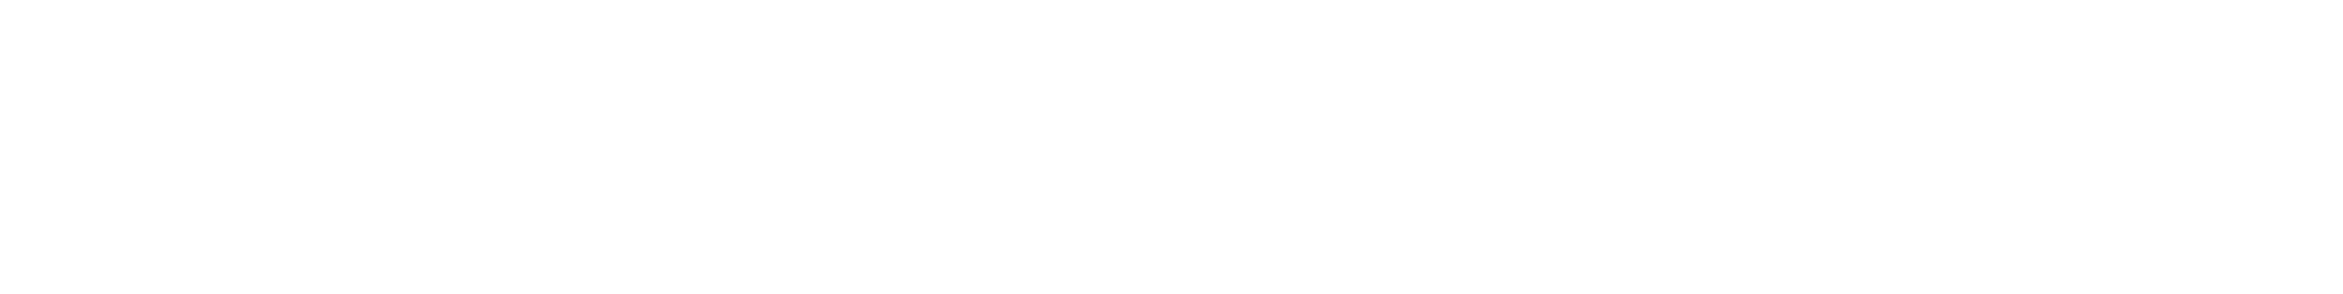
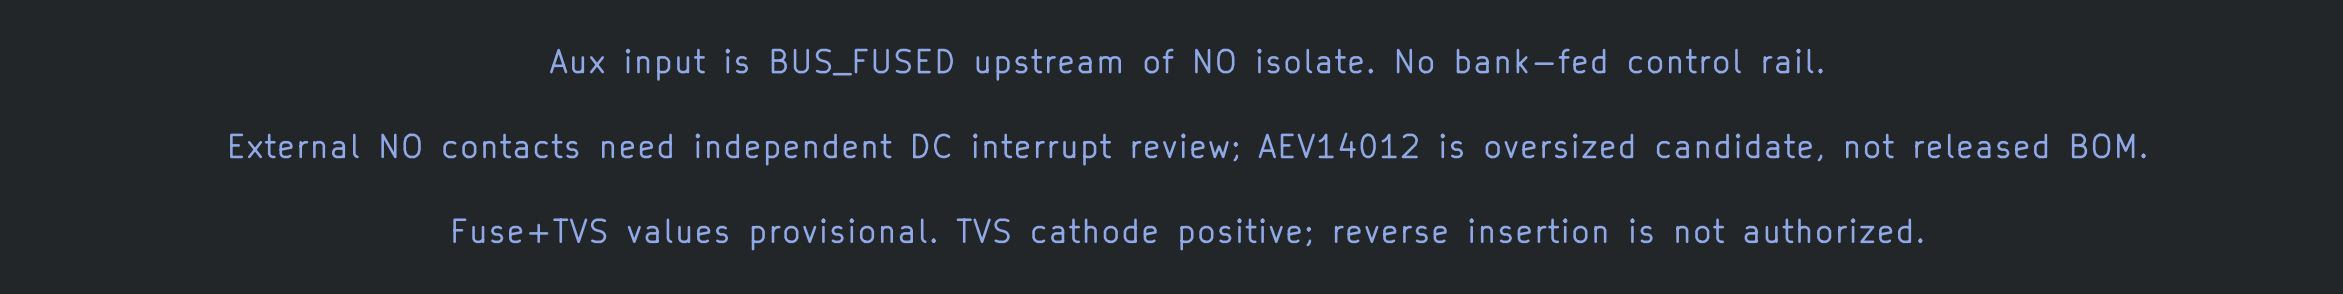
text: none -> Aux input is BUS_FUSED upstream of NO isolate. No bank-fed control rail. (1186, 64)
text: none -> External NO contacts need independent DC interrupt review; AEV14012 is oversized candidate, not released BOM. (1188, 149)
text: none -> Fuse+TVS values provisional. TVS cathode positive; reverse insertion is not authorized. (1188, 234)

